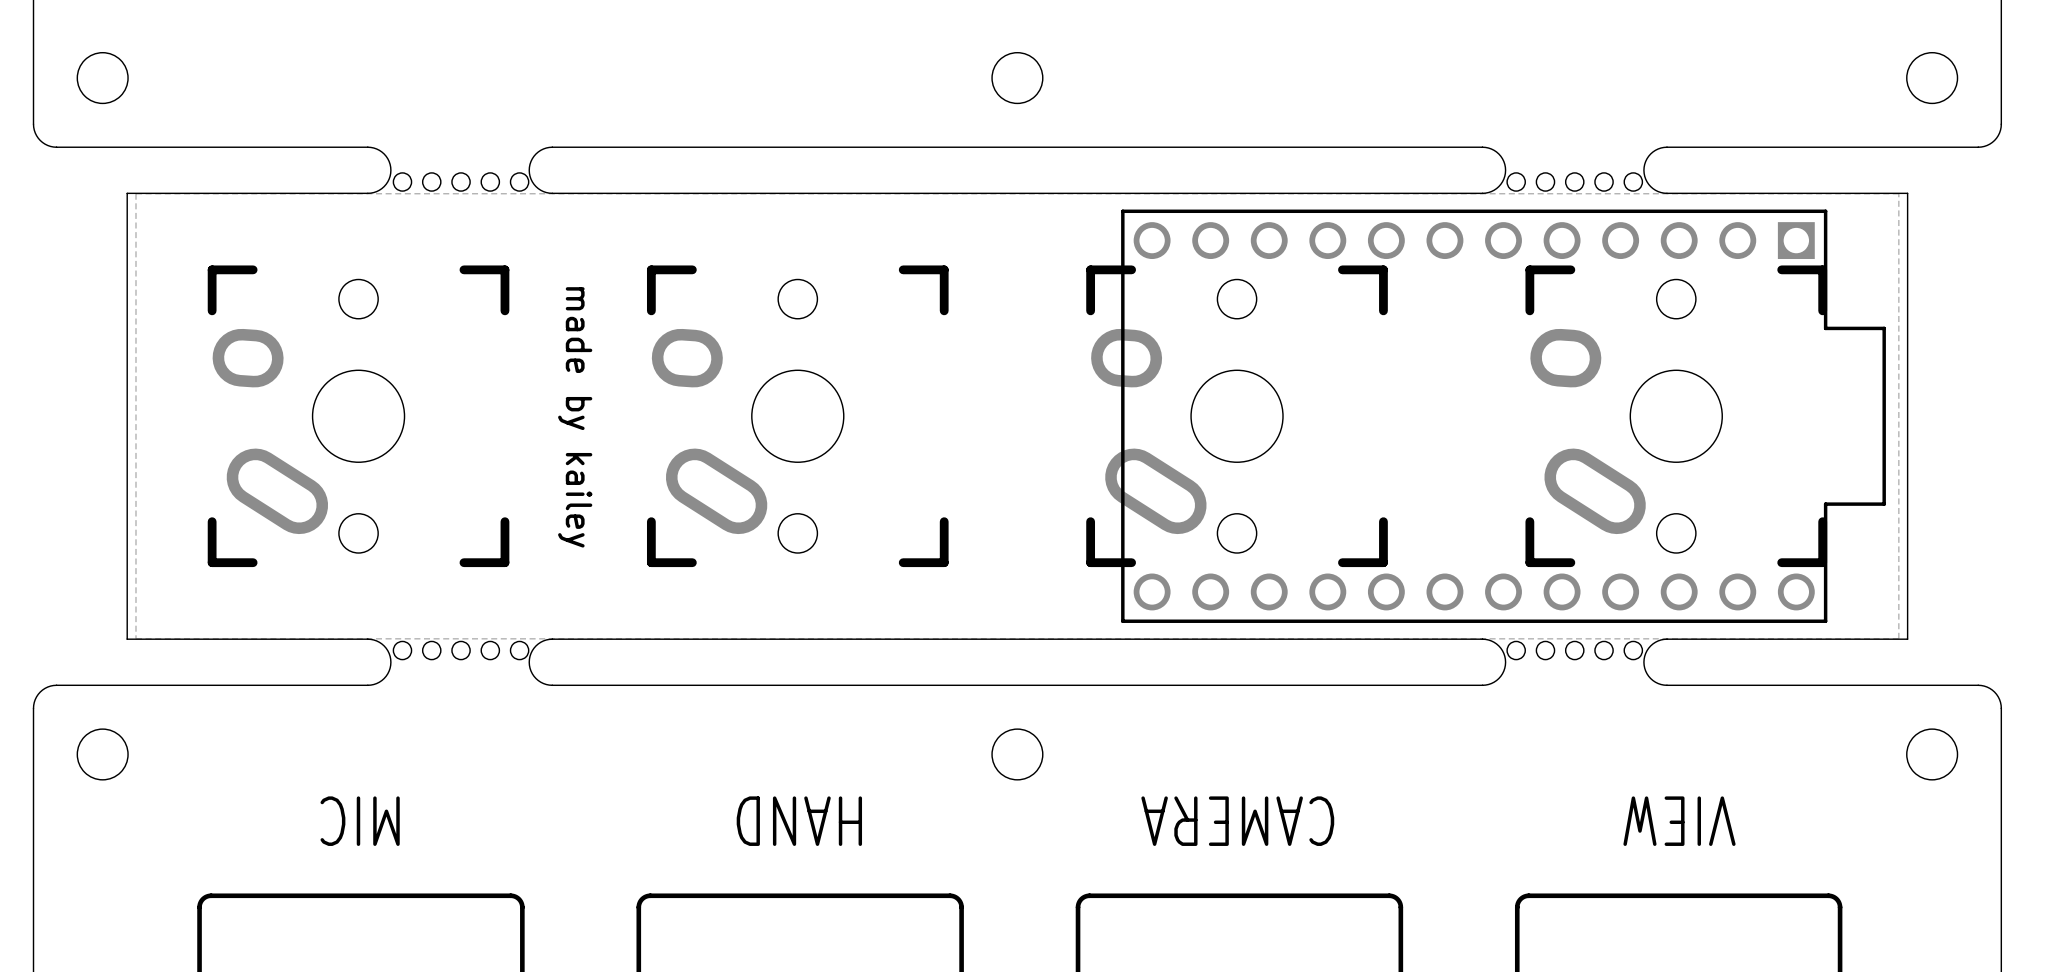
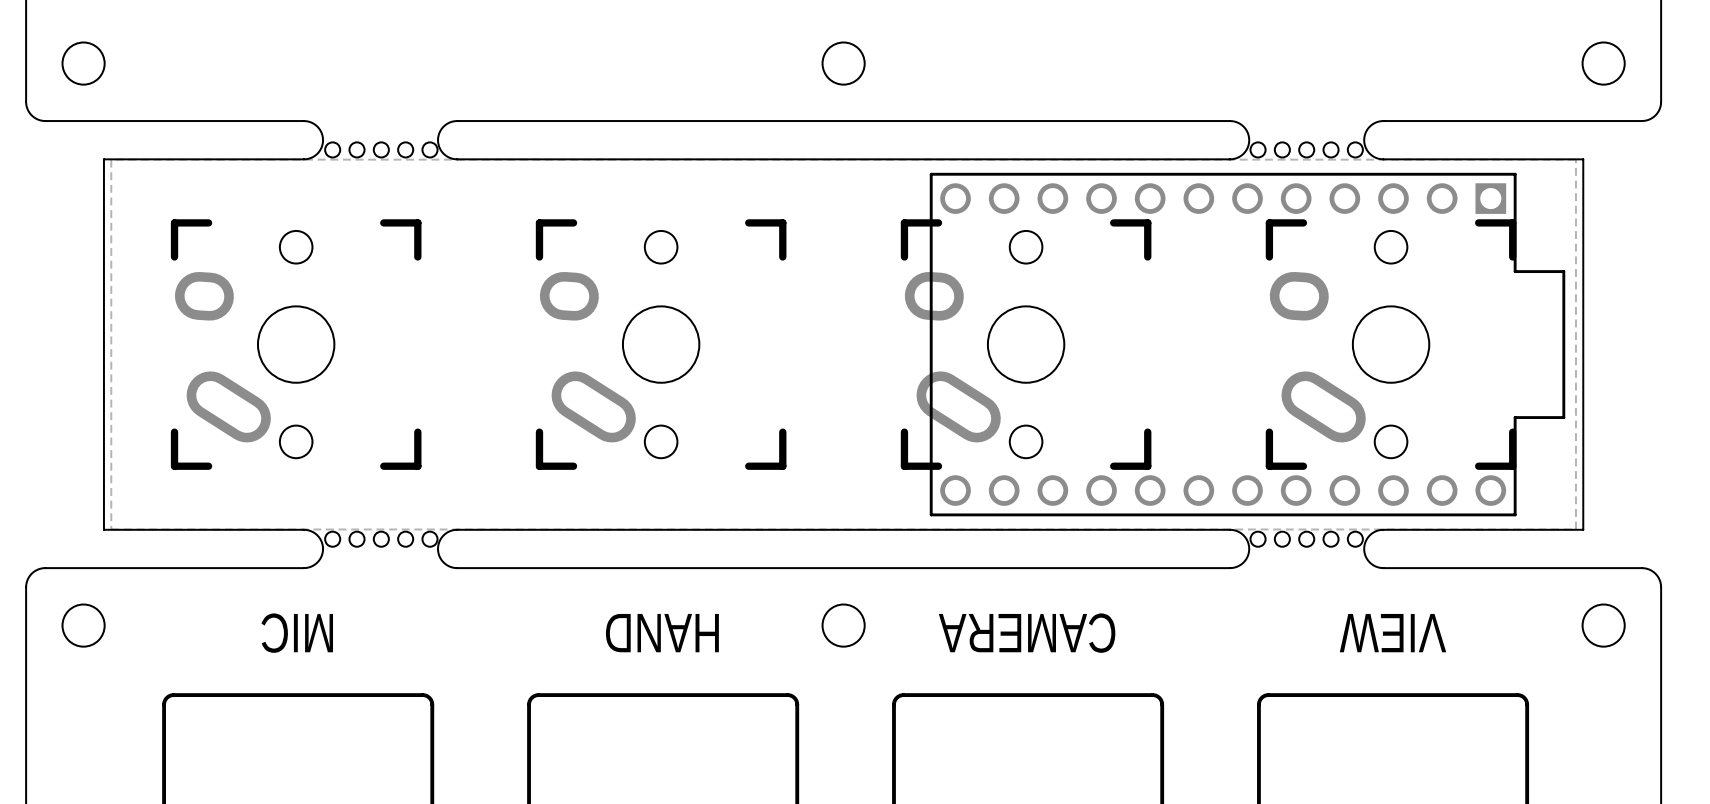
text: made by kailey (575, 417) -> none
text position: MIC (360, 821) -> MIC (297, 633)
text position: HAND (799, 821) -> HAND (662, 633)
text position: CAMERA (1237, 821) -> CAMERA (1027, 633)
text position: VIEW (1679, 821) -> VIEW (1393, 633)
board edge: (522, 907) (518, 899) (510, 895) (211, 895) (202, 899) (199, 907) -> (432, 752) (432, 703) (428, 697) (422, 695) (171, 695) (166, 697) (164, 703) (164, 752)
board edge: (961, 907) (958, 899) (950, 895) (650, 895) (642, 899) (638, 907) -> (797, 752) (797, 703) (793, 697) (787, 695) (536, 695) (531, 698) (529, 703) (529, 752)
board edge: (1400, 907) (1397, 899) (1389, 895) (1089, 895) (1081, 899) (1078, 907) -> (1162, 752) (1162, 703) (1158, 697) (1152, 695) (901, 695) (895, 698) (894, 703) (893, 752)
board edge: (1840, 907) (1836, 899) (1828, 895) (1528, 895) (1520, 899) (1517, 907) -> (1527, 752) (1527, 703) (1523, 697) (1517, 695) (1266, 695) (1260, 698) (1259, 703) (1258, 752)

